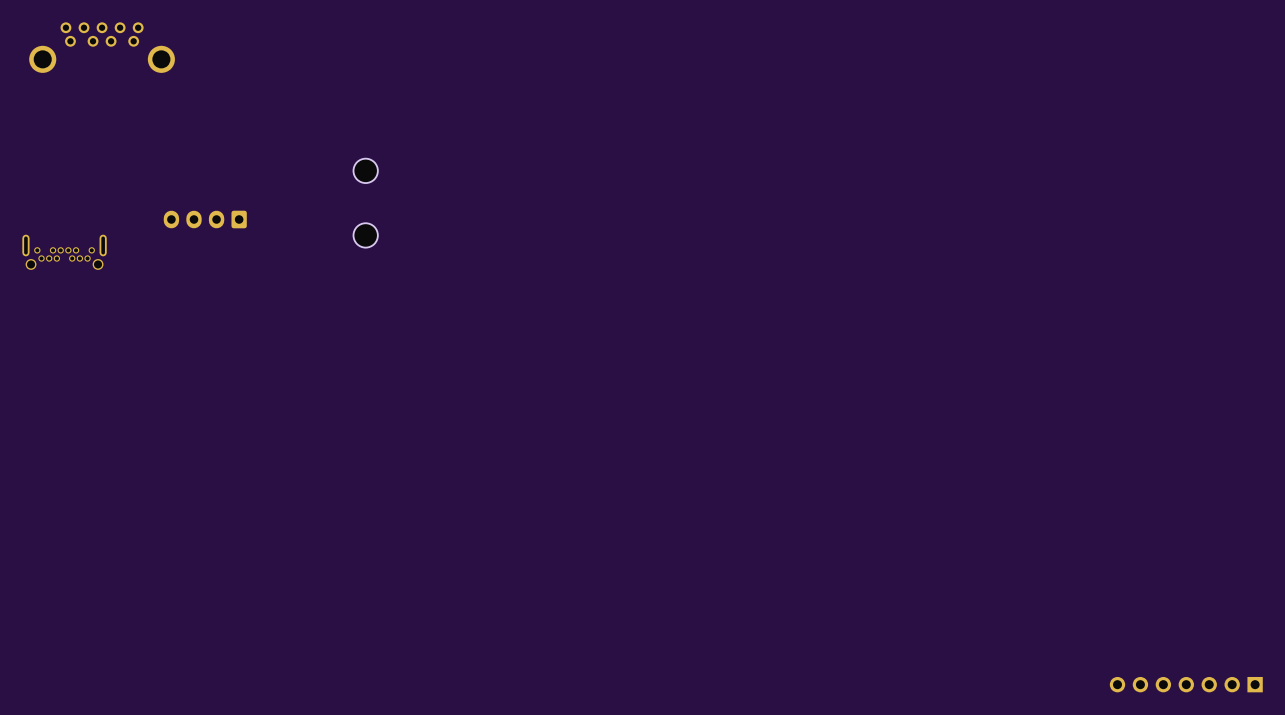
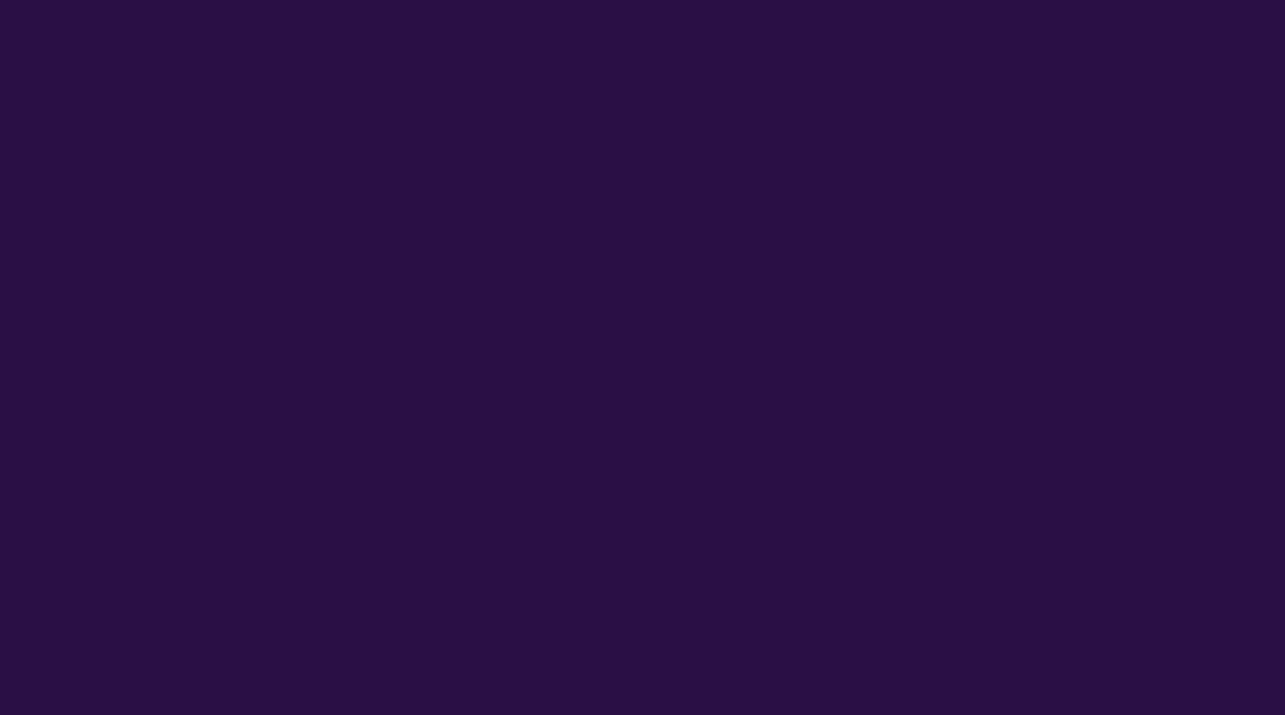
part: (102, 47) -> none
part: (365, 170) -> none
part: (205, 219) -> none
part: (365, 235) -> none
part: (64, 252) -> none
part: (1186, 684) -> none

